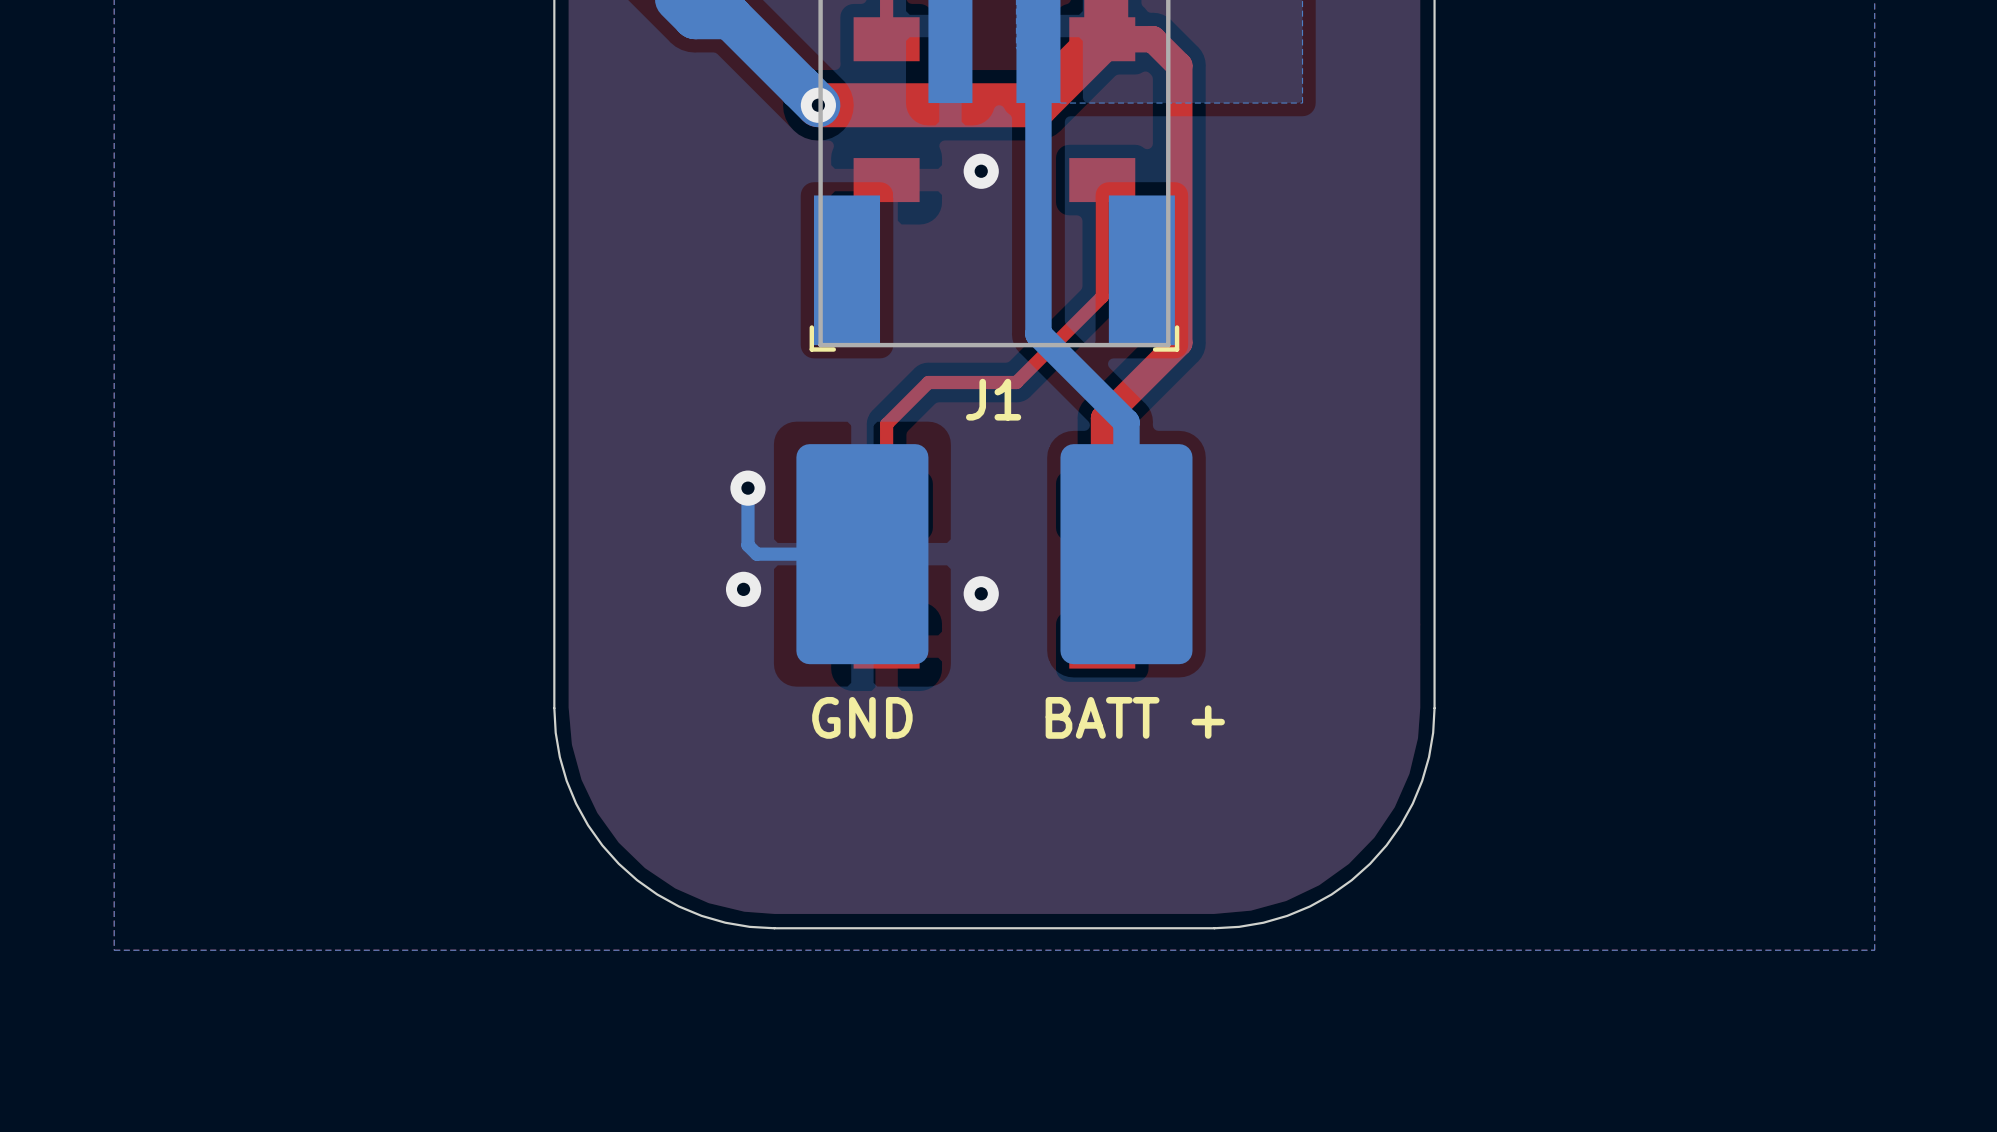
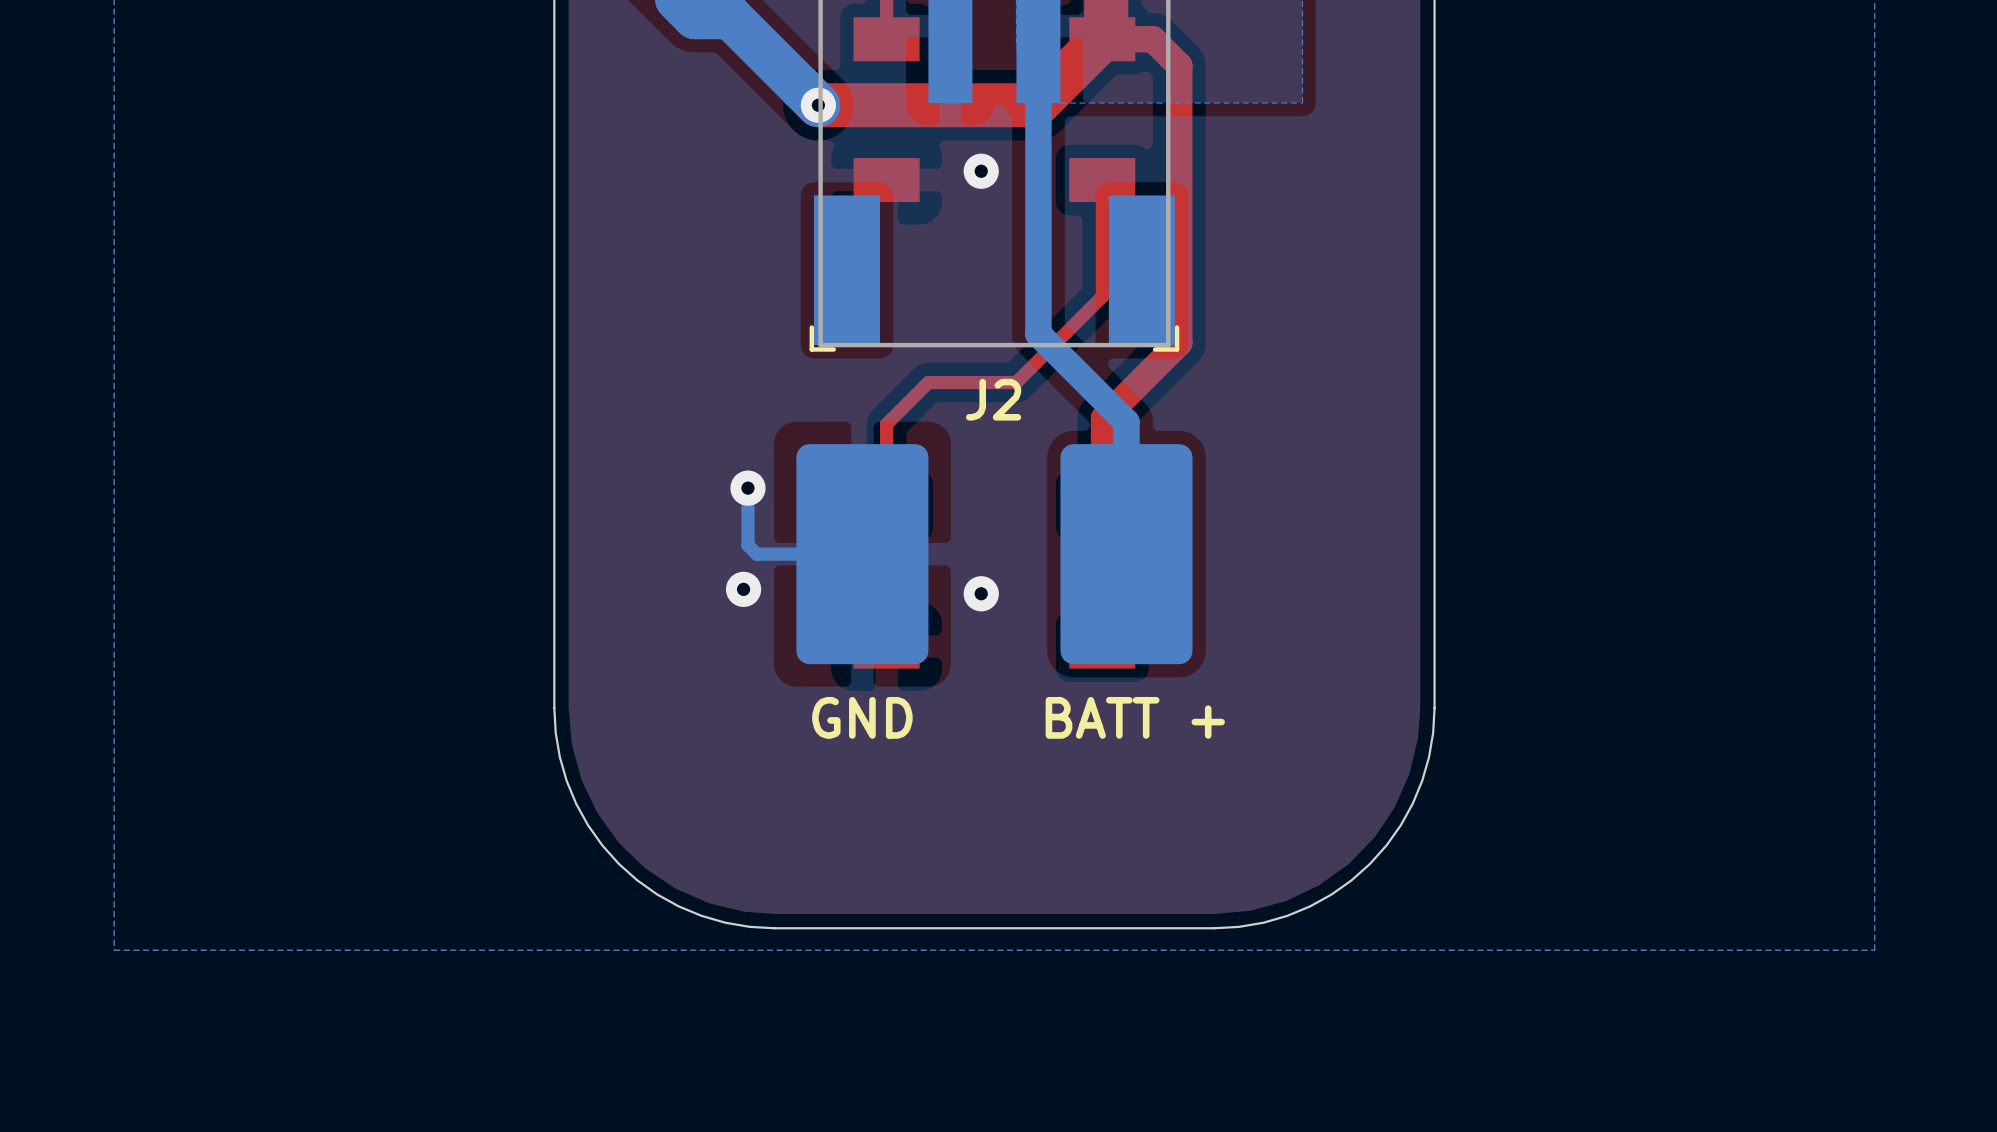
J1 name: J1 (993, 399) -> J2 (993, 399)

